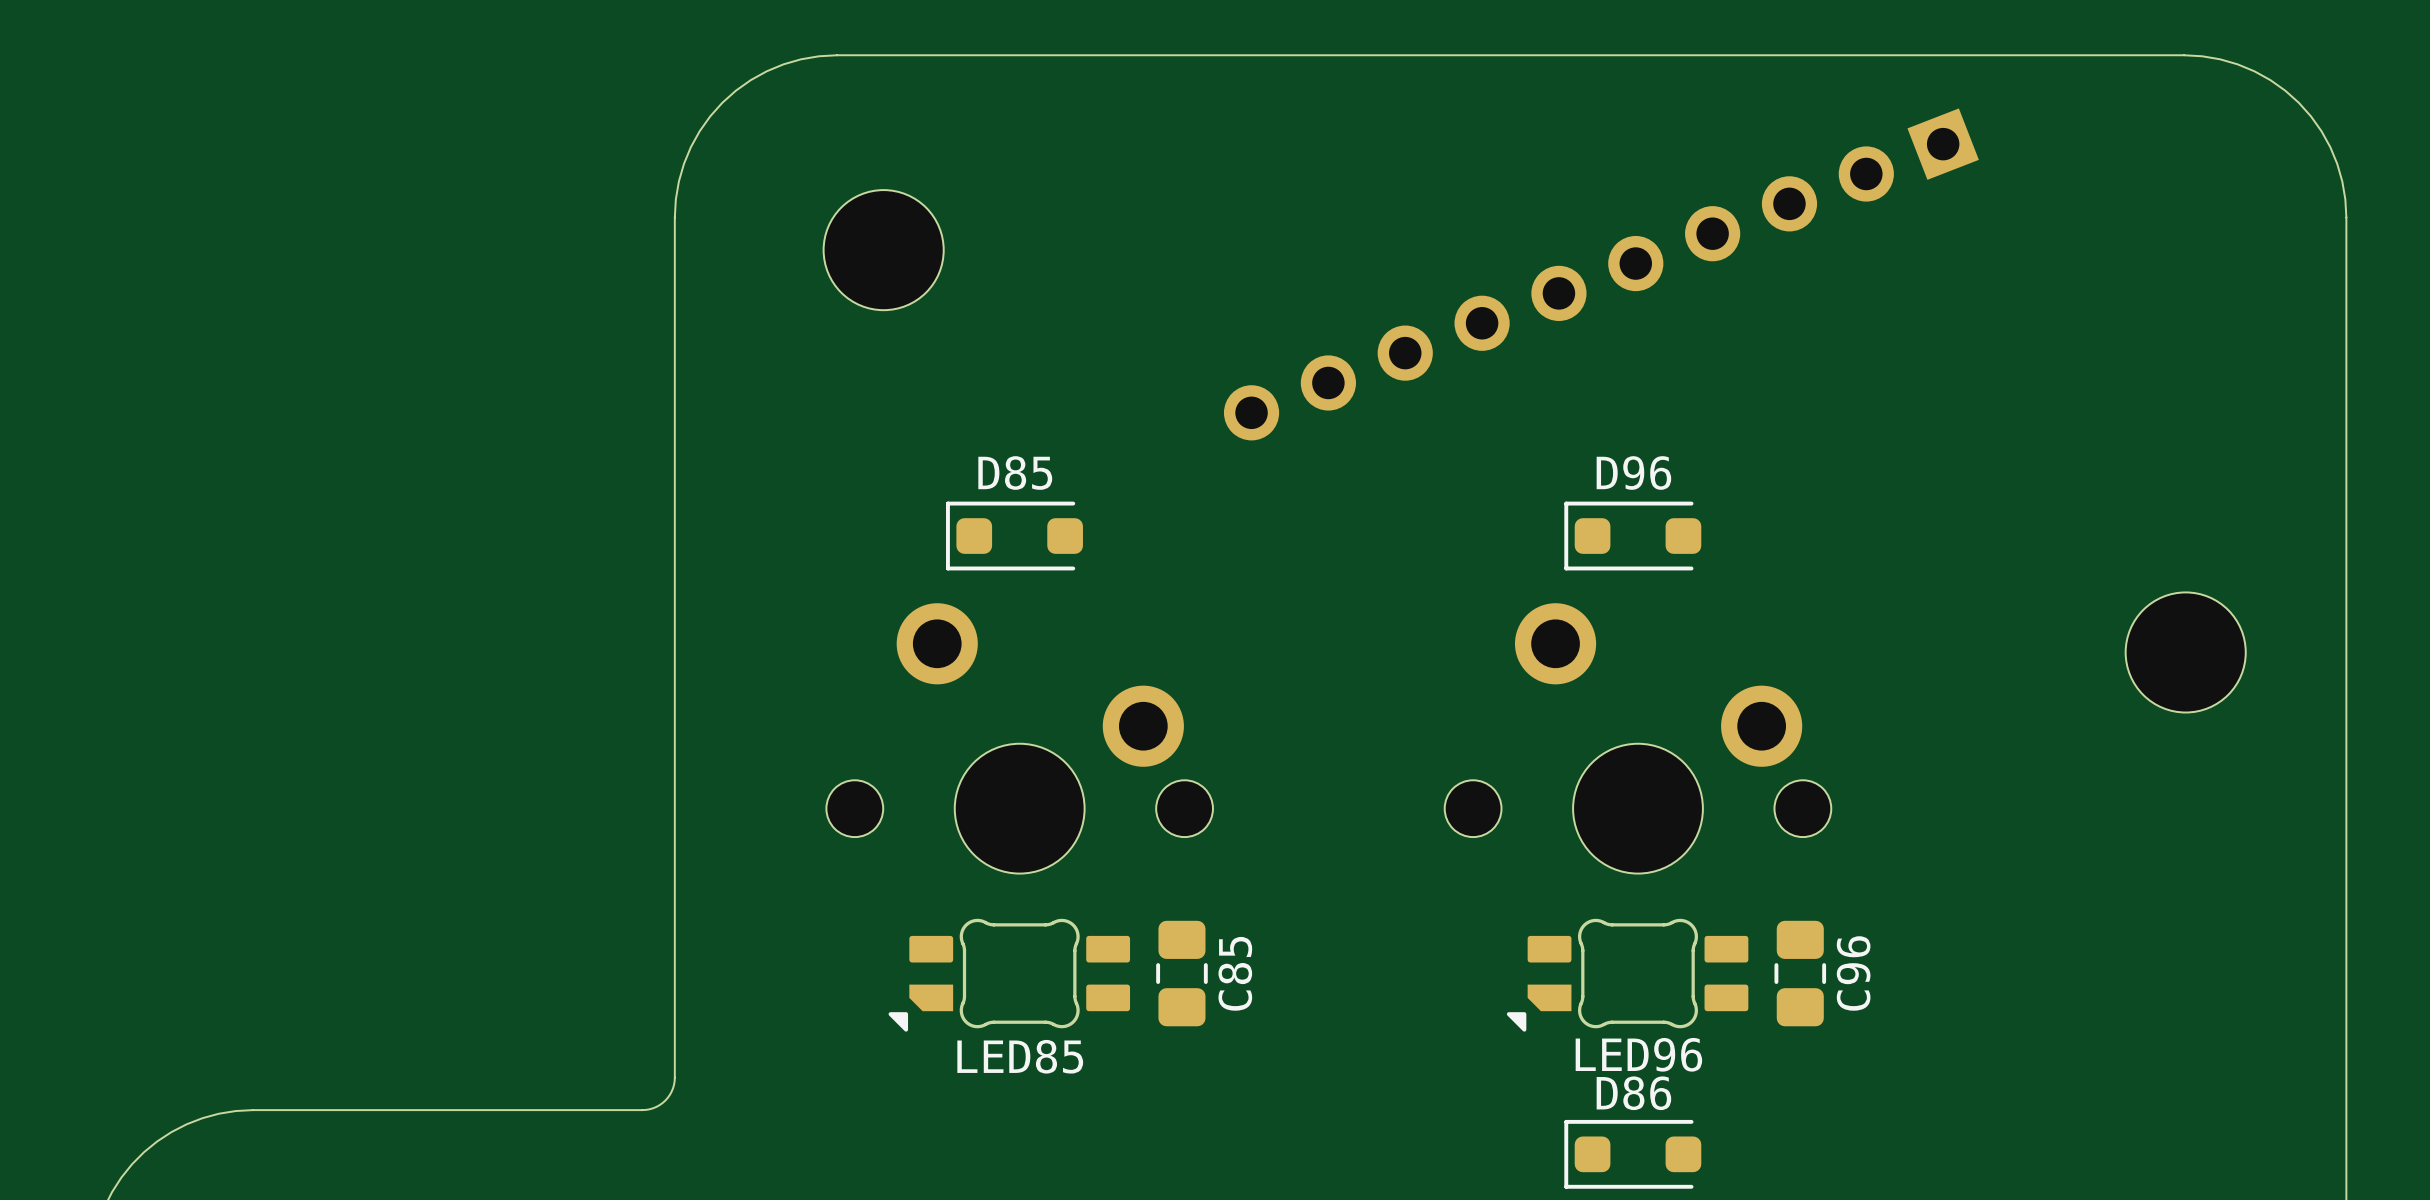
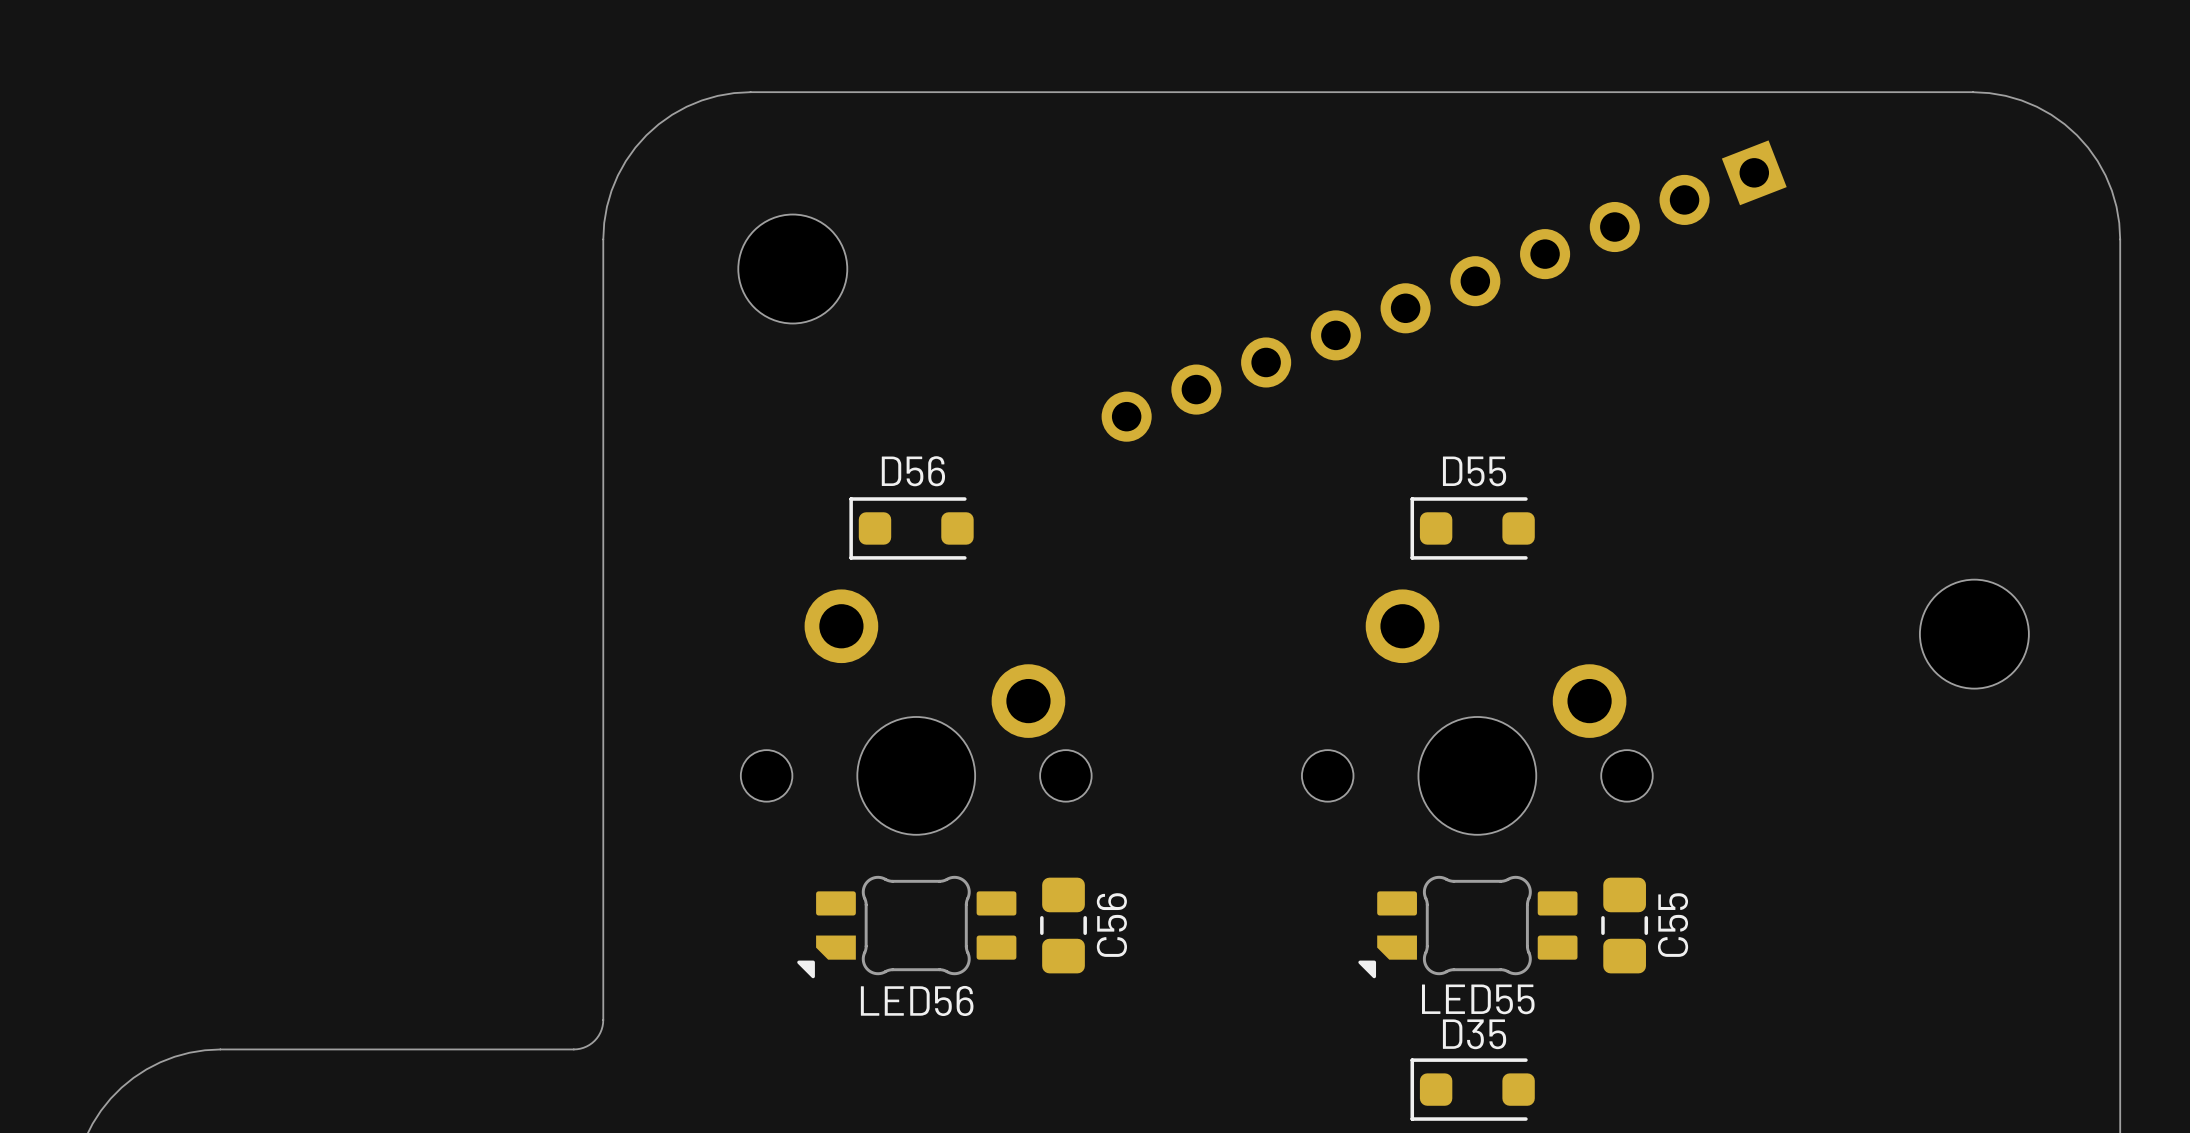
D85 name: D85 (1015, 473) -> D56 (913, 471)
D96 name: D96 (1633, 473) -> D55 (1474, 471)
C85 name: C85 (1235, 973) -> C56 (1111, 925)
C96 name: C96 (1853, 973) -> C55 (1673, 925)
LED96 name: LED96 (1638, 1054) -> LED55 (1478, 999)
LED85 name: LED85 (1020, 1056) -> LED56 (917, 1000)
D86 name: D86 (1633, 1093) -> D35 (1474, 1034)

